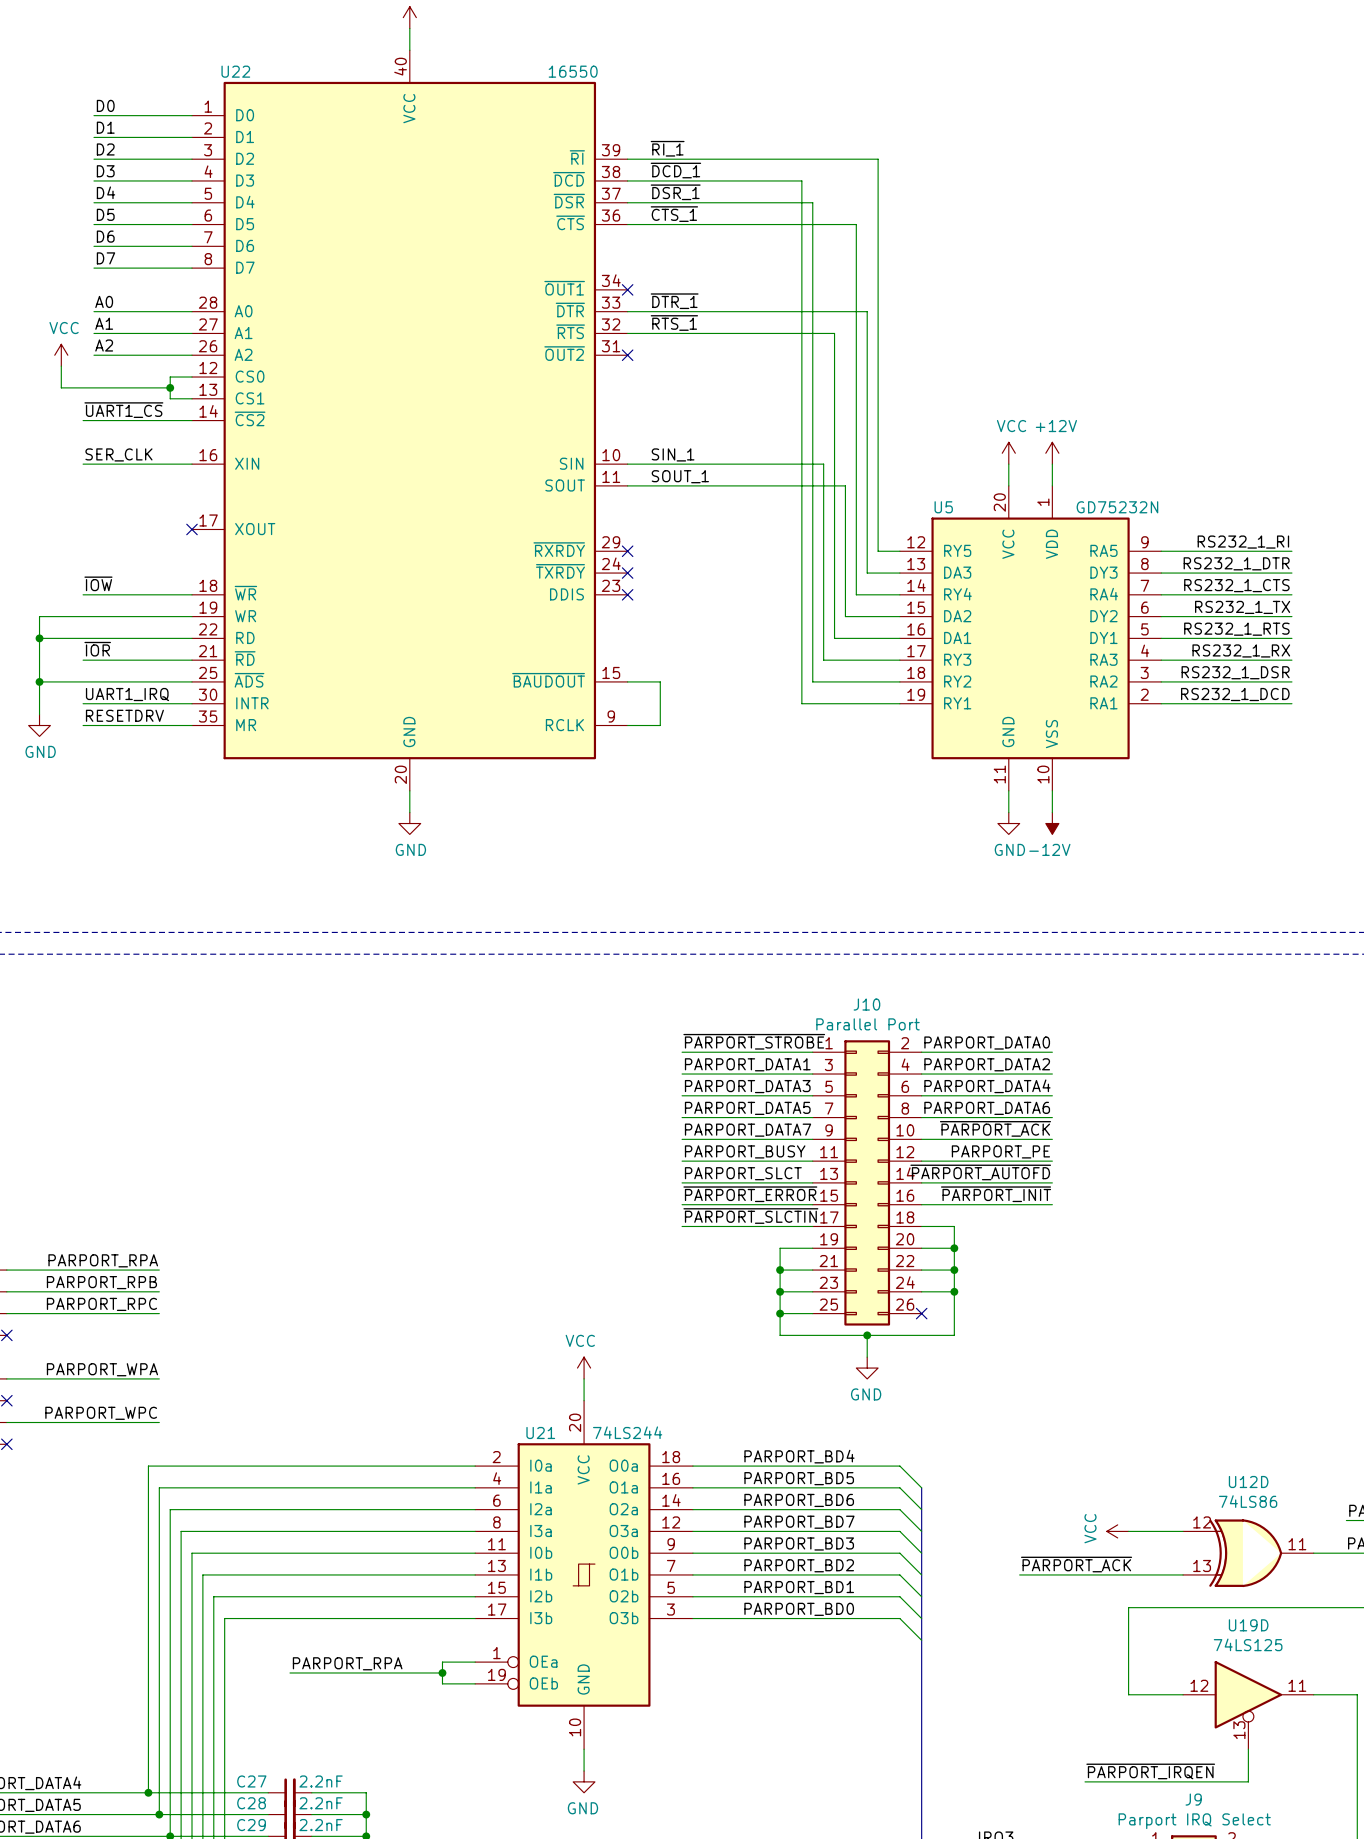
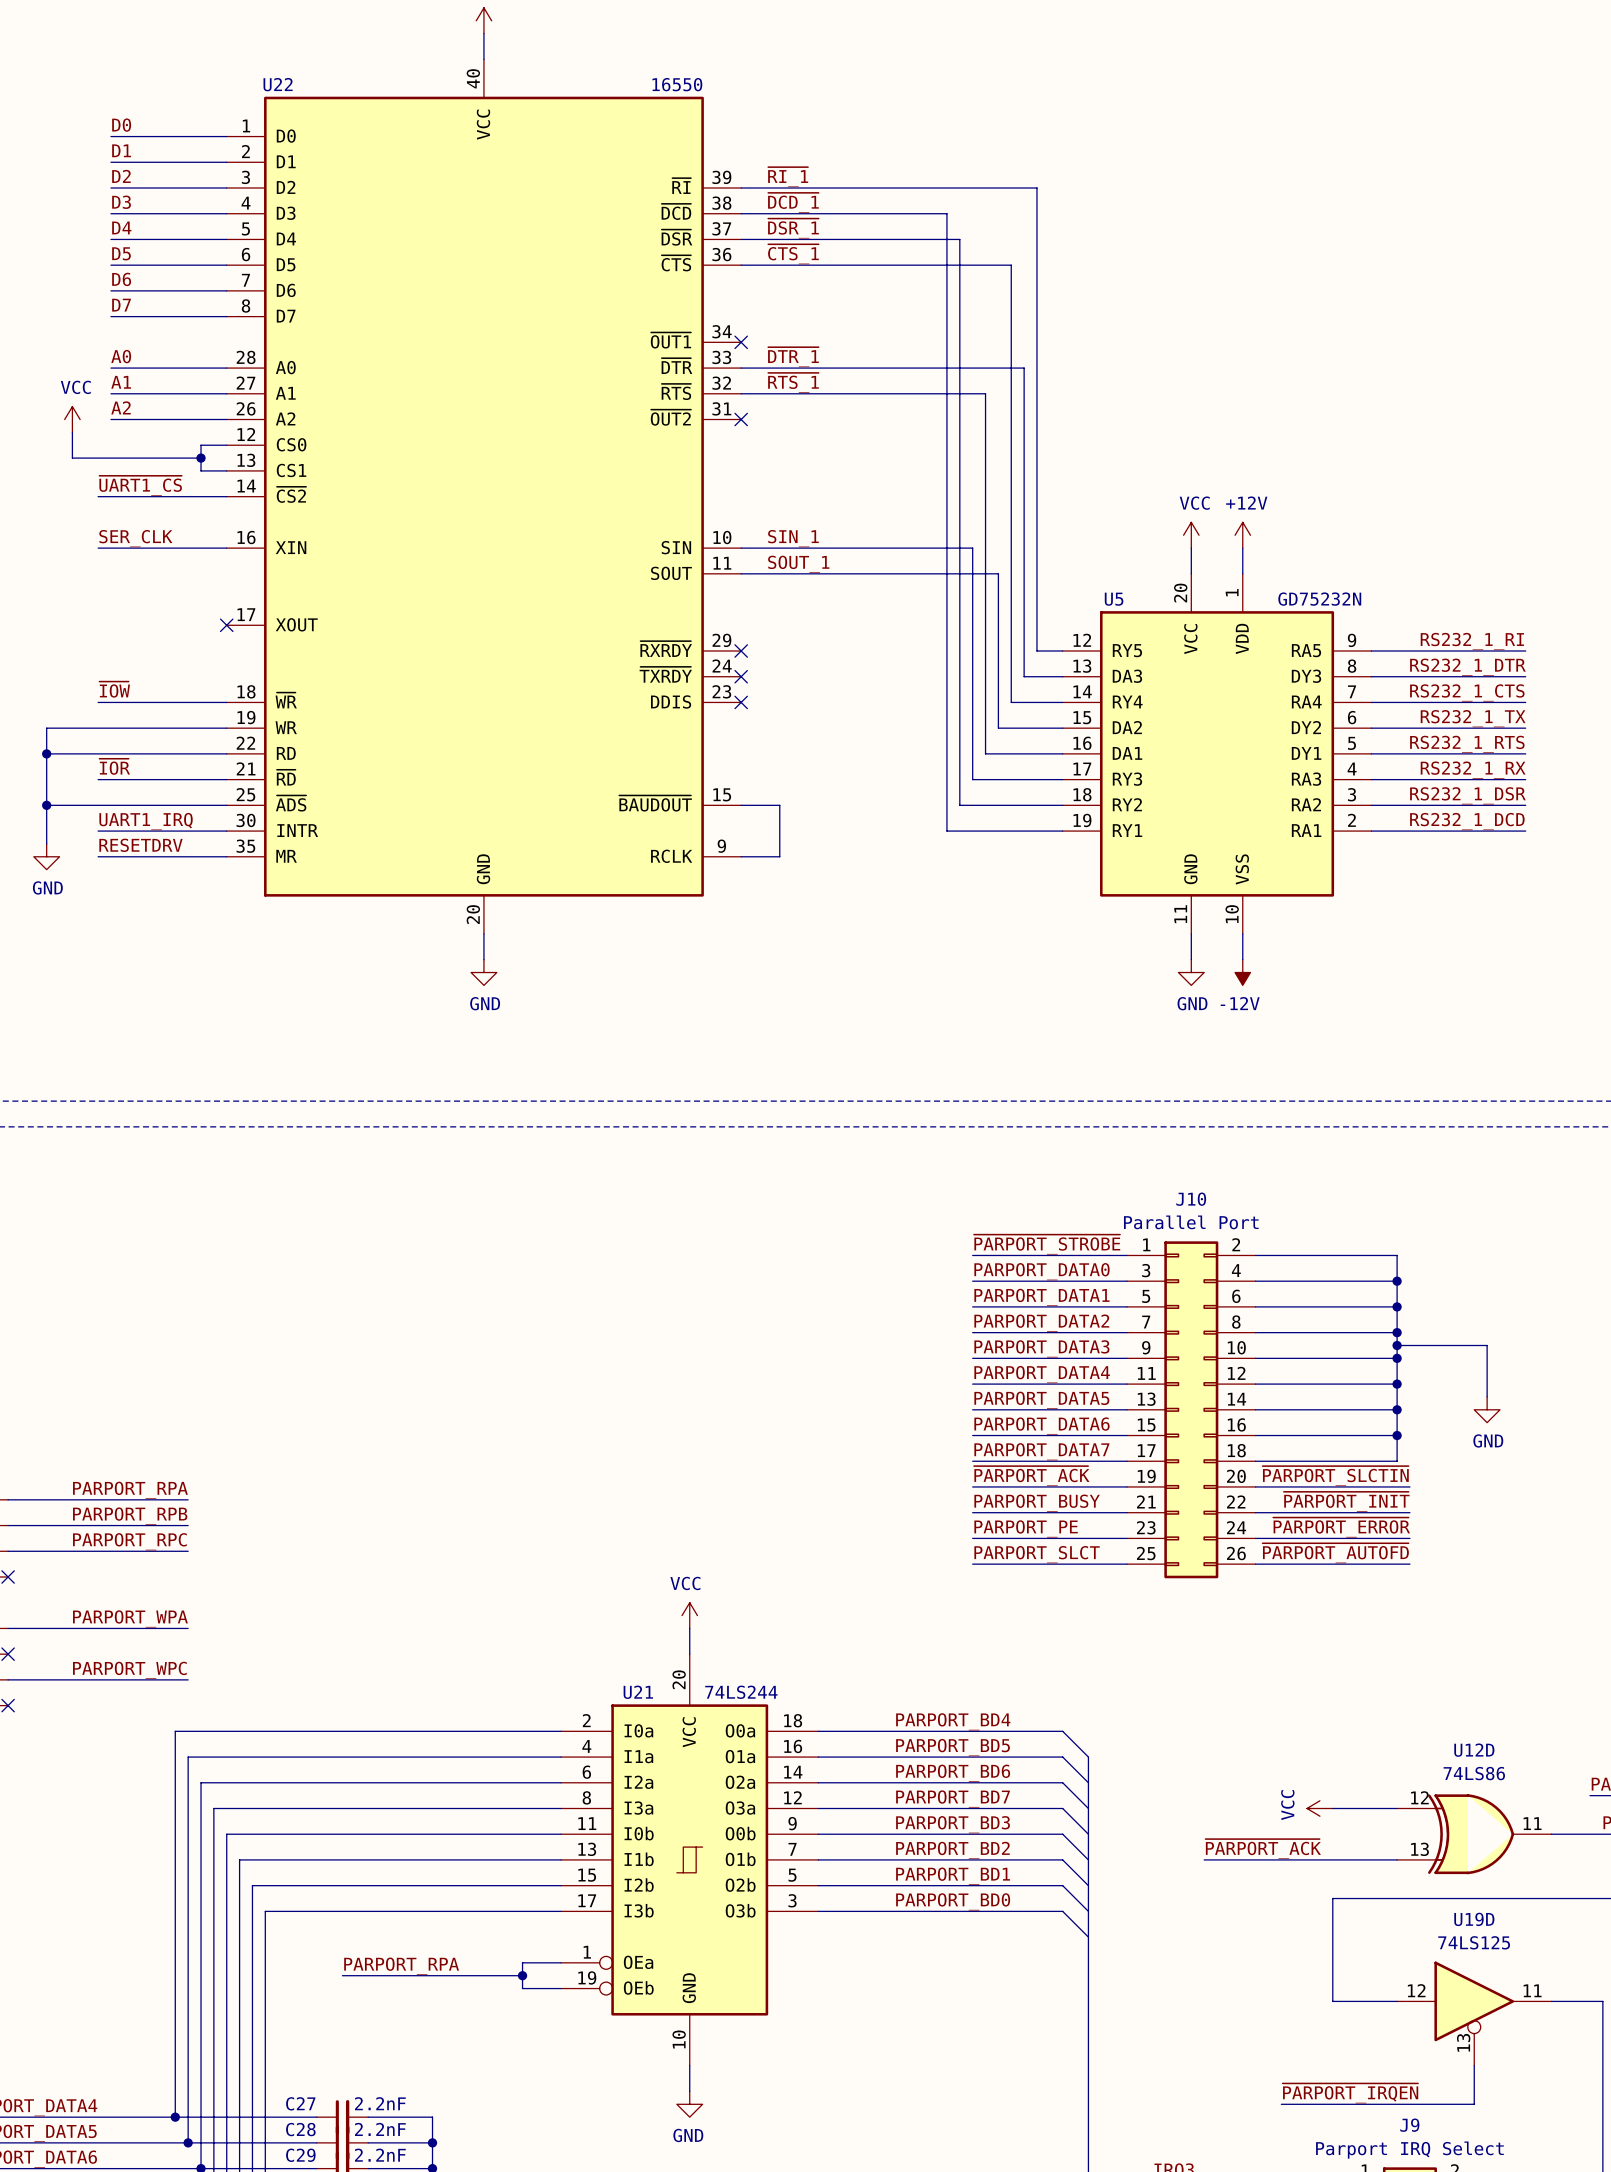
label position: ~{PARPORT_STROBE} (754, 1041) -> ~{PARPORT_STROBE} (1047, 1244)
label: PARPORT_DATA0 (987, 1043) -> none
wire: (682, 1052) (812, 1052) -> (972, 1358) (1127, 1358)
wire: (921, 1052) (1052, 1052) -> (972, 1255) (1127, 1255)
wire: none -> (1255, 1255) (1397, 1255) (1397, 1461) (1255, 1461)
label position: PARPORT_DATA1 (747, 1064) -> PARPORT_DATA1 (1041, 1297)
label: PARPORT_DATA2 (987, 1064) -> none
wire: (682, 1074) (812, 1074) -> (972, 1384) (1127, 1384)
wire: (921, 1074) (1052, 1074) -> (972, 1281) (1127, 1281)
label: none -> PARPORT_DATA0 (1041, 1271)
wire: none -> (1255, 1281) (1397, 1281)
junction: none -> (1397, 1281)
label position: PARPORT_DATA3 (747, 1086) -> PARPORT_DATA3 (1041, 1348)
label: PARPORT_DATA4 (987, 1086) -> none
wire: (682, 1095) (812, 1095) -> (972, 1409) (1127, 1409)
wire: (921, 1095) (1052, 1095) -> (972, 1306) (1127, 1306)
wire: none -> (1255, 1306) (1397, 1306)
junction: none -> (1397, 1306)
label position: PARPORT_DATA5 (747, 1108) -> PARPORT_DATA5 (1041, 1400)
label: PARPORT_DATA6 (987, 1108) -> none
wire: (682, 1117) (812, 1117) -> (972, 1435) (1127, 1435)
wire: (921, 1117) (1052, 1117) -> (972, 1332) (1127, 1332)
label: none -> PARPORT_DATA2 (1041, 1323)
label: ~{PARPORT_ACK} (995, 1128) -> none
wire: none -> (1255, 1332) (1397, 1332)
junction: none -> (1397, 1332)
label position: PARPORT_DATA7 (748, 1130) -> PARPORT_DATA7 (1041, 1451)
wire: (682, 1139) (812, 1139) -> (972, 1461) (1127, 1461)
wire: (921, 1139) (1052, 1139) -> none
wire: none -> (1397, 1345) (1487, 1345) (1487, 1396)
junction: none -> (1397, 1345)
wire: none -> (1255, 1358) (1397, 1358)
junction: none -> (1397, 1358)
label position: PARPORT_BUSY (745, 1151) -> PARPORT_BUSY (1037, 1503)
label: PARPORT_PE (1000, 1151) -> none
wire: (682, 1161) (812, 1161) -> (972, 1486) (1127, 1486)
wire: (921, 1161) (1052, 1161) -> (1255, 1486) (1409, 1486)
label: none -> PARPORT_DATA4 (1042, 1374)
label position: ~{PARPORT_AUTOFD} (980, 1172) -> ~{PARPORT_AUTOFD} (1335, 1553)
wire: none -> (1255, 1384) (1397, 1384)
junction: none -> (1397, 1384)
label position: PARPORT_SLCT (743, 1173) -> PARPORT_SLCT (1037, 1554)
wire: (682, 1182) (812, 1182) -> (972, 1512) (1127, 1512)
J10 position: (867, 1182) -> (1191, 1409)
wire: (921, 1182) (1052, 1182) -> (1255, 1512) (1409, 1512)
wire: none -> (1255, 1409) (1397, 1409)
junction: none -> (1397, 1409)
power symbol: none -> GND (1487, 1409)
label: ~{PARPORT_ERROR} (750, 1194) -> none
label position: ~{PARPORT_INIT} (996, 1194) -> ~{PARPORT_INIT} (1346, 1501)
wire: (682, 1204) (812, 1204) -> (972, 1538) (1127, 1538)
wire: (921, 1204) (1052, 1204) -> (1255, 1538) (1409, 1538)
label: none -> PARPORT_DATA6 (1041, 1426)
wire: none -> (1255, 1435) (1397, 1435)
junction: none -> (1397, 1435)
label: ~{PARPORT_SLCTIN} (750, 1216) -> none
wire: (682, 1226) (812, 1226) -> (972, 1564) (1127, 1564)
wire: (921, 1226) (954, 1226) (954, 1335) (780, 1335) (780, 1248) (812, 1248) -> none
label: none -> ~{PARPORT_ACK} (1031, 1476)
wire: (921, 1248) (954, 1248) -> none
junction: (954, 1248) -> none
label: none -> ~{PARPORT_SLCTIN} (1335, 1476)
wire: (780, 1270) (812, 1270) -> none
junction: (780, 1270) -> none
wire: (921, 1270) (954, 1270) -> none
junction: (954, 1270) -> none
wire: (780, 1291) (812, 1291) -> none
junction: (780, 1291) -> none
wire: (921, 1291) (954, 1291) -> none
junction: (954, 1291) -> none
label: none -> ~{PARPORT_ERROR} (1341, 1527)
label: none -> PARPORT_PE (1026, 1528)
wire: (780, 1313) (812, 1313) -> none
junction: (780, 1313) -> none
no-connect mark: (921, 1313) -> none
wire: none -> (1255, 1564) (1409, 1564)
wire: (867, 1335) (867, 1357) -> none
junction: (867, 1335) -> none
power symbol: GND (867, 1368) -> none

